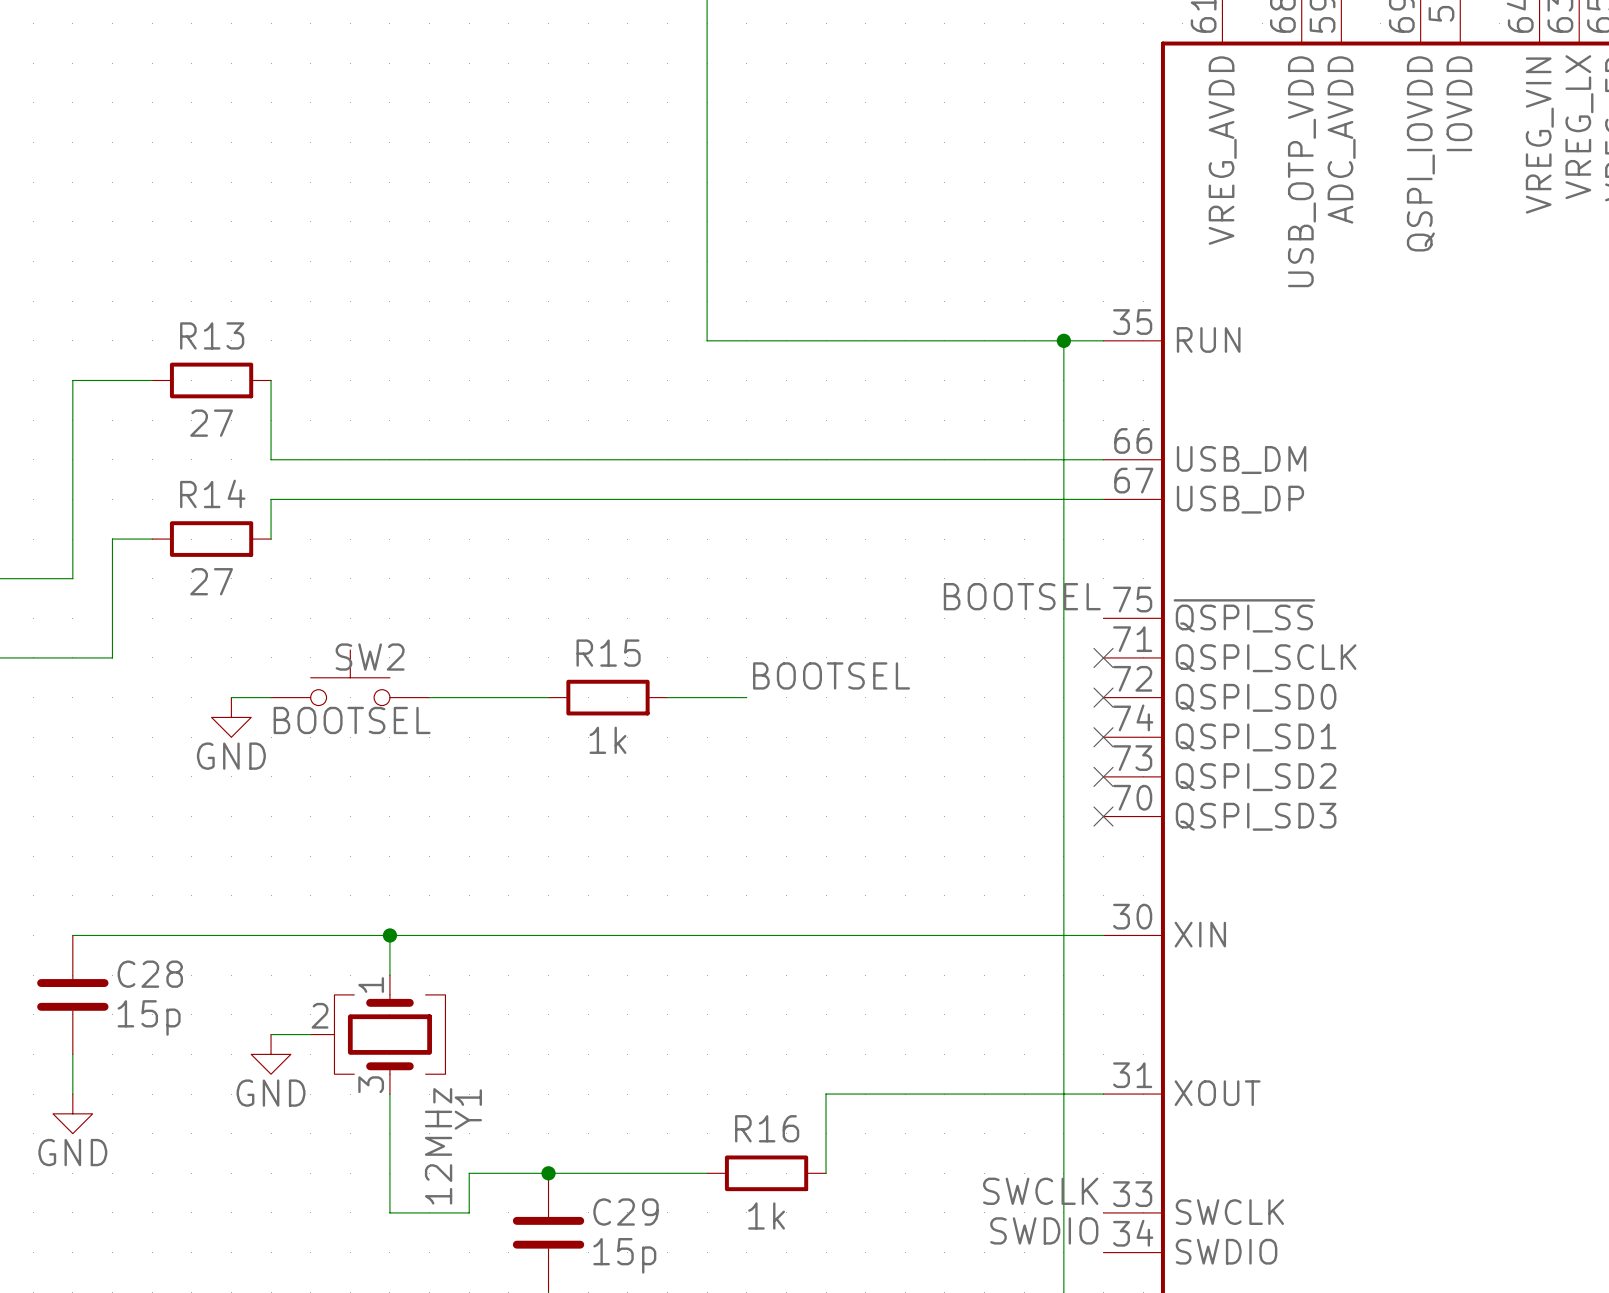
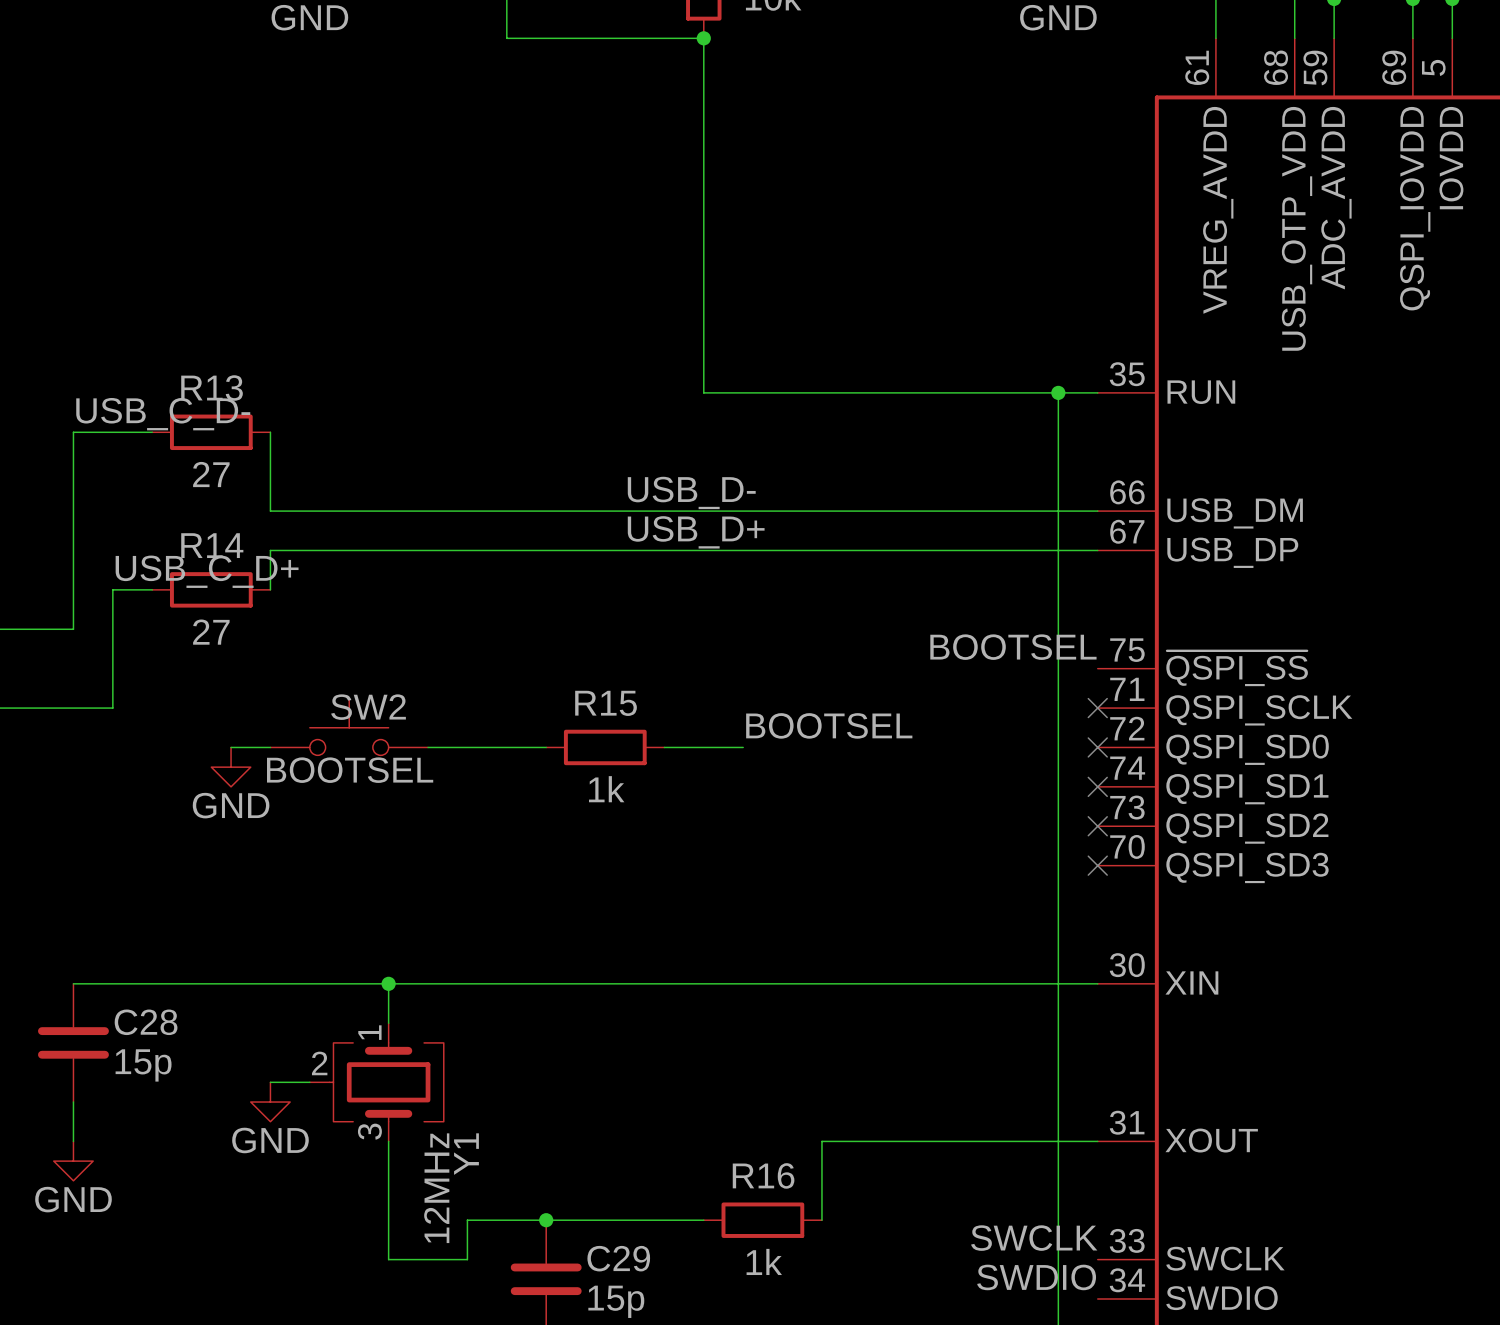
label: none -> USB_C_D- (163, 414)
label: none -> USB_D- (691, 492)
label: none -> USB_D+ (696, 532)
label: none -> USB_C_D+ (207, 571)

